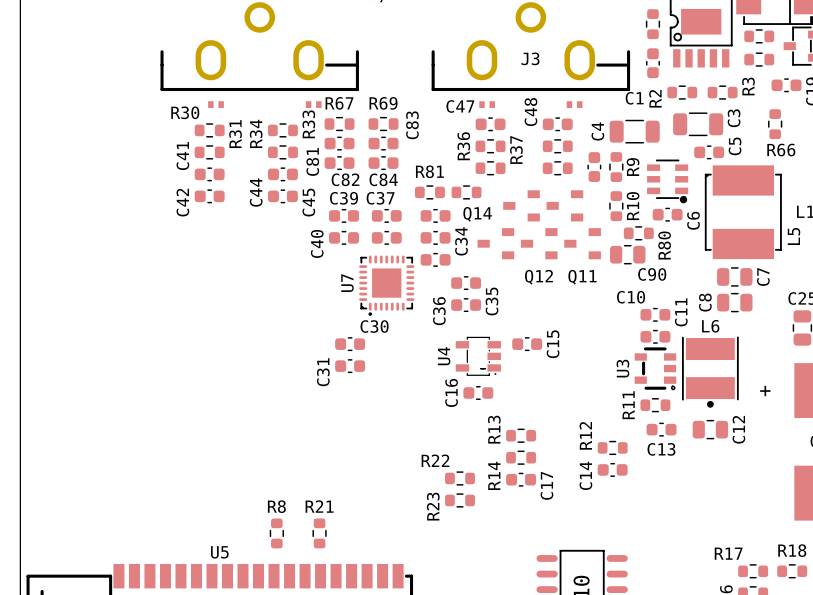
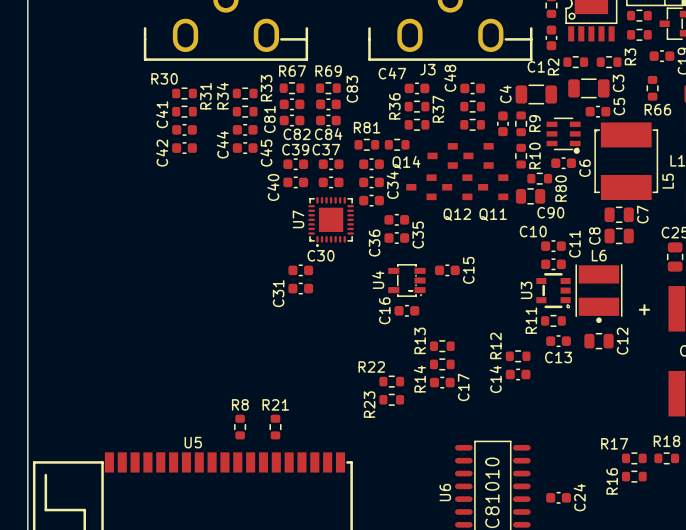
J3 name position: J3 (530, 58) -> J3 (427, 69)
part: (216, 104) -> none
part: (313, 104) -> none
part: (487, 104) -> none
part: (574, 104) -> none

